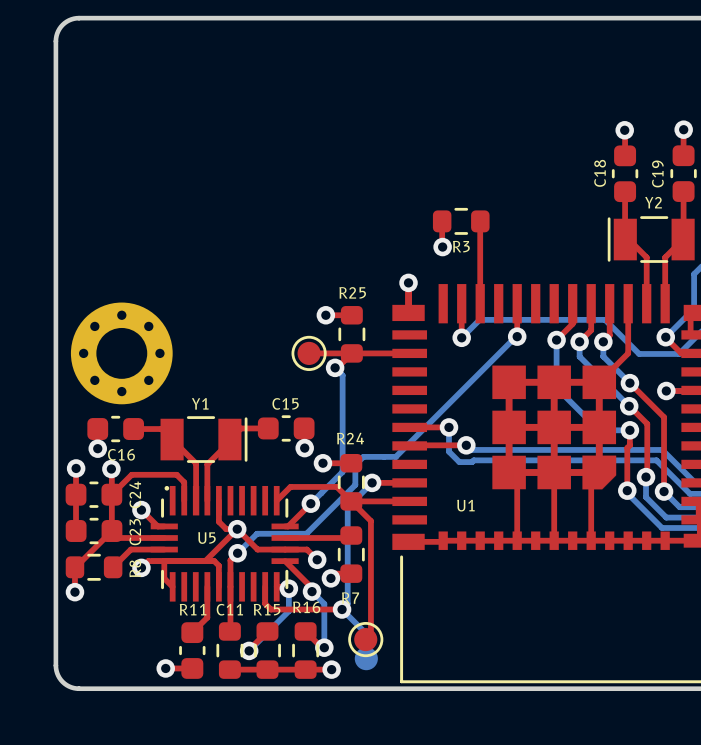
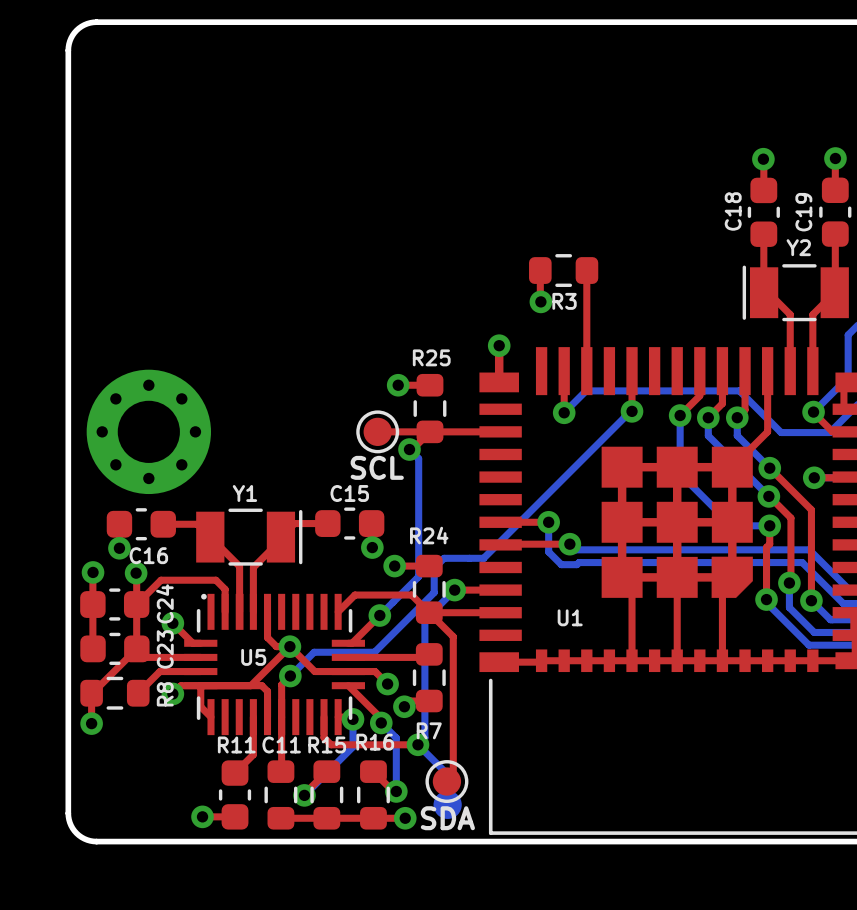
text: none -> SCL (377, 467)
text: none -> SDA (447, 818)

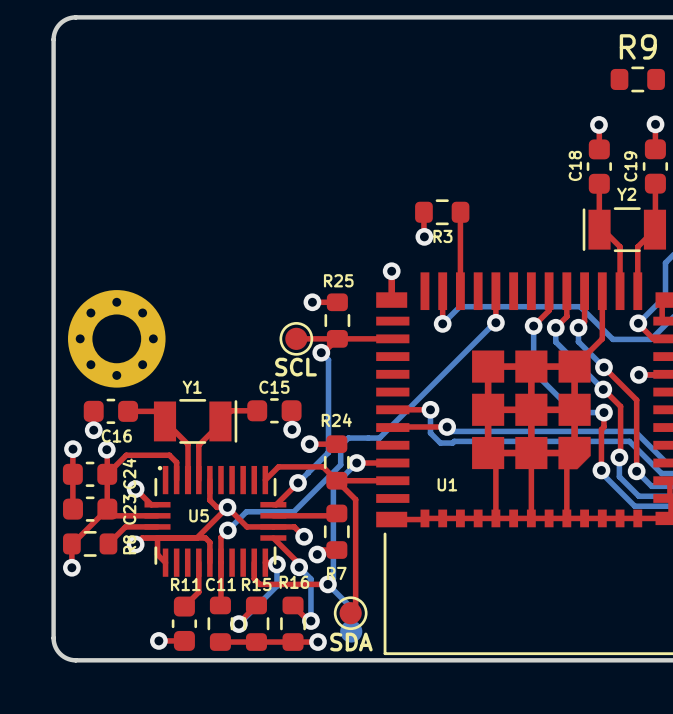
R9: none -> (637, 79)

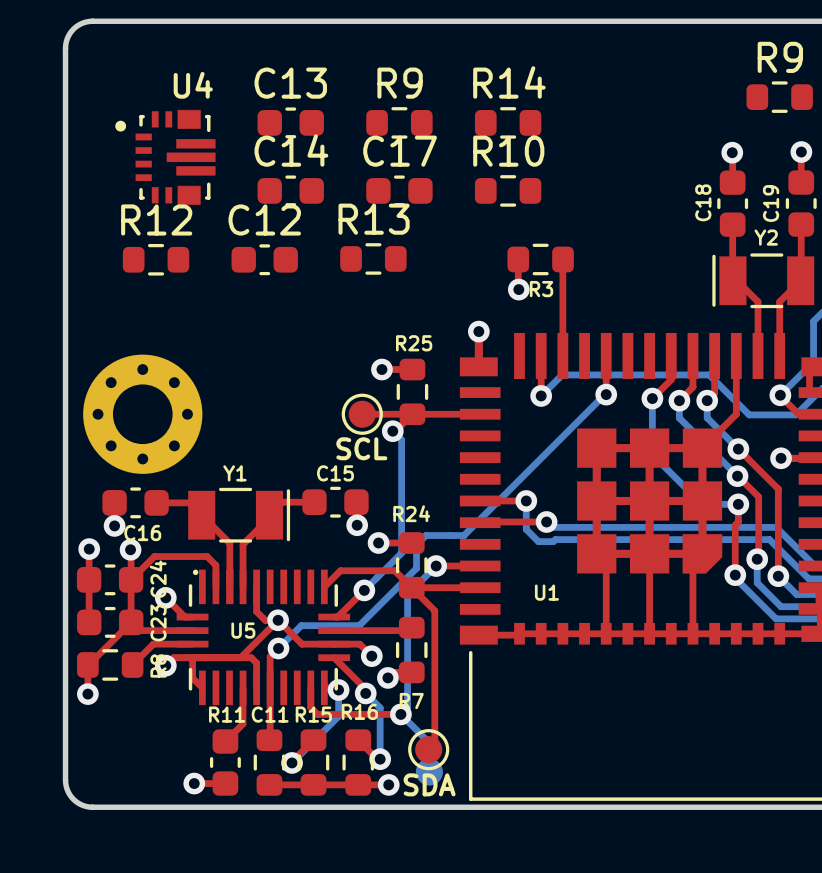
C13: none -> (290, 122)
R9: none -> (399, 122)
R14: none -> (508, 122)
U4: none -> (165, 157)
C14: none -> (290, 190)
C17: none -> (399, 190)
R10: none -> (508, 190)
R13: none -> (373, 258)
R12: none -> (156, 259)
C12: none -> (264, 259)

